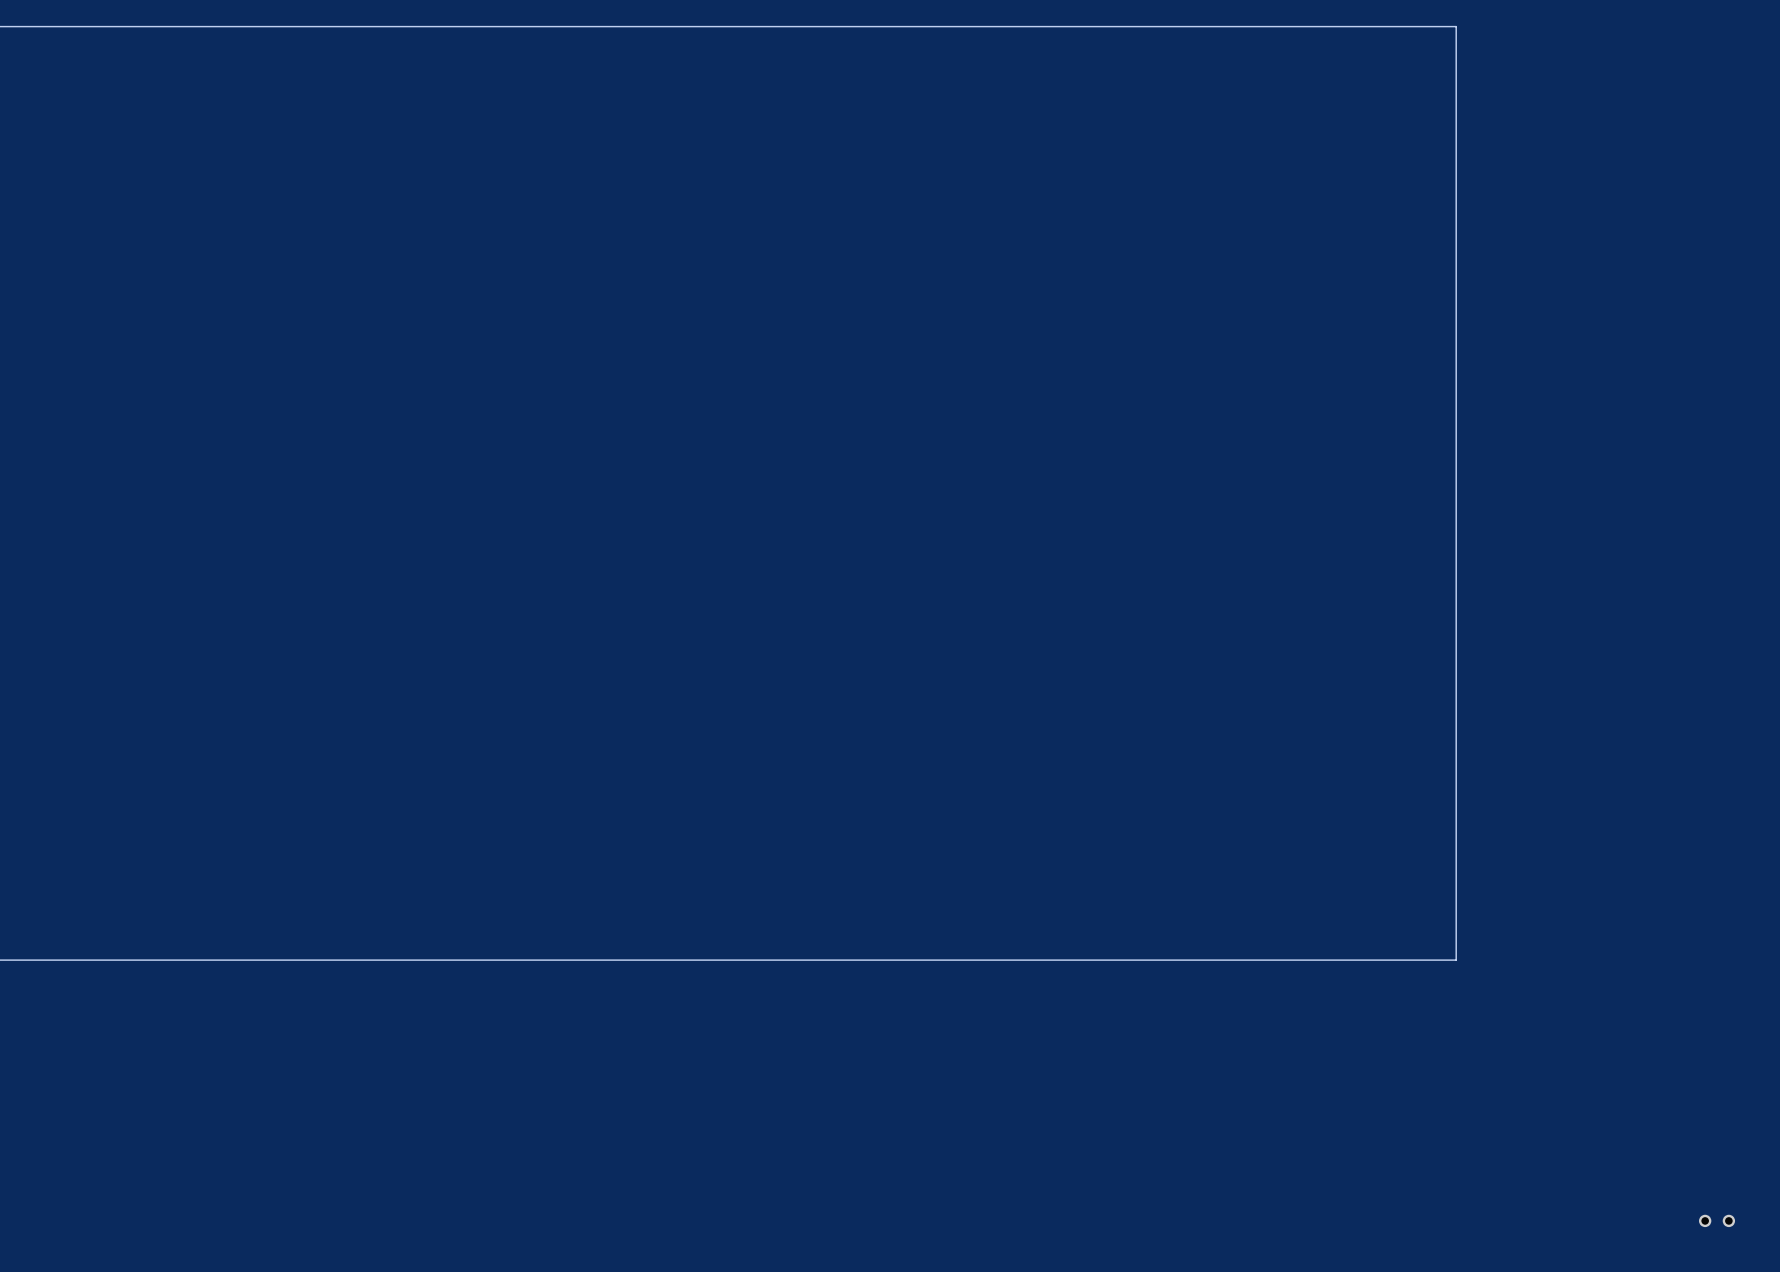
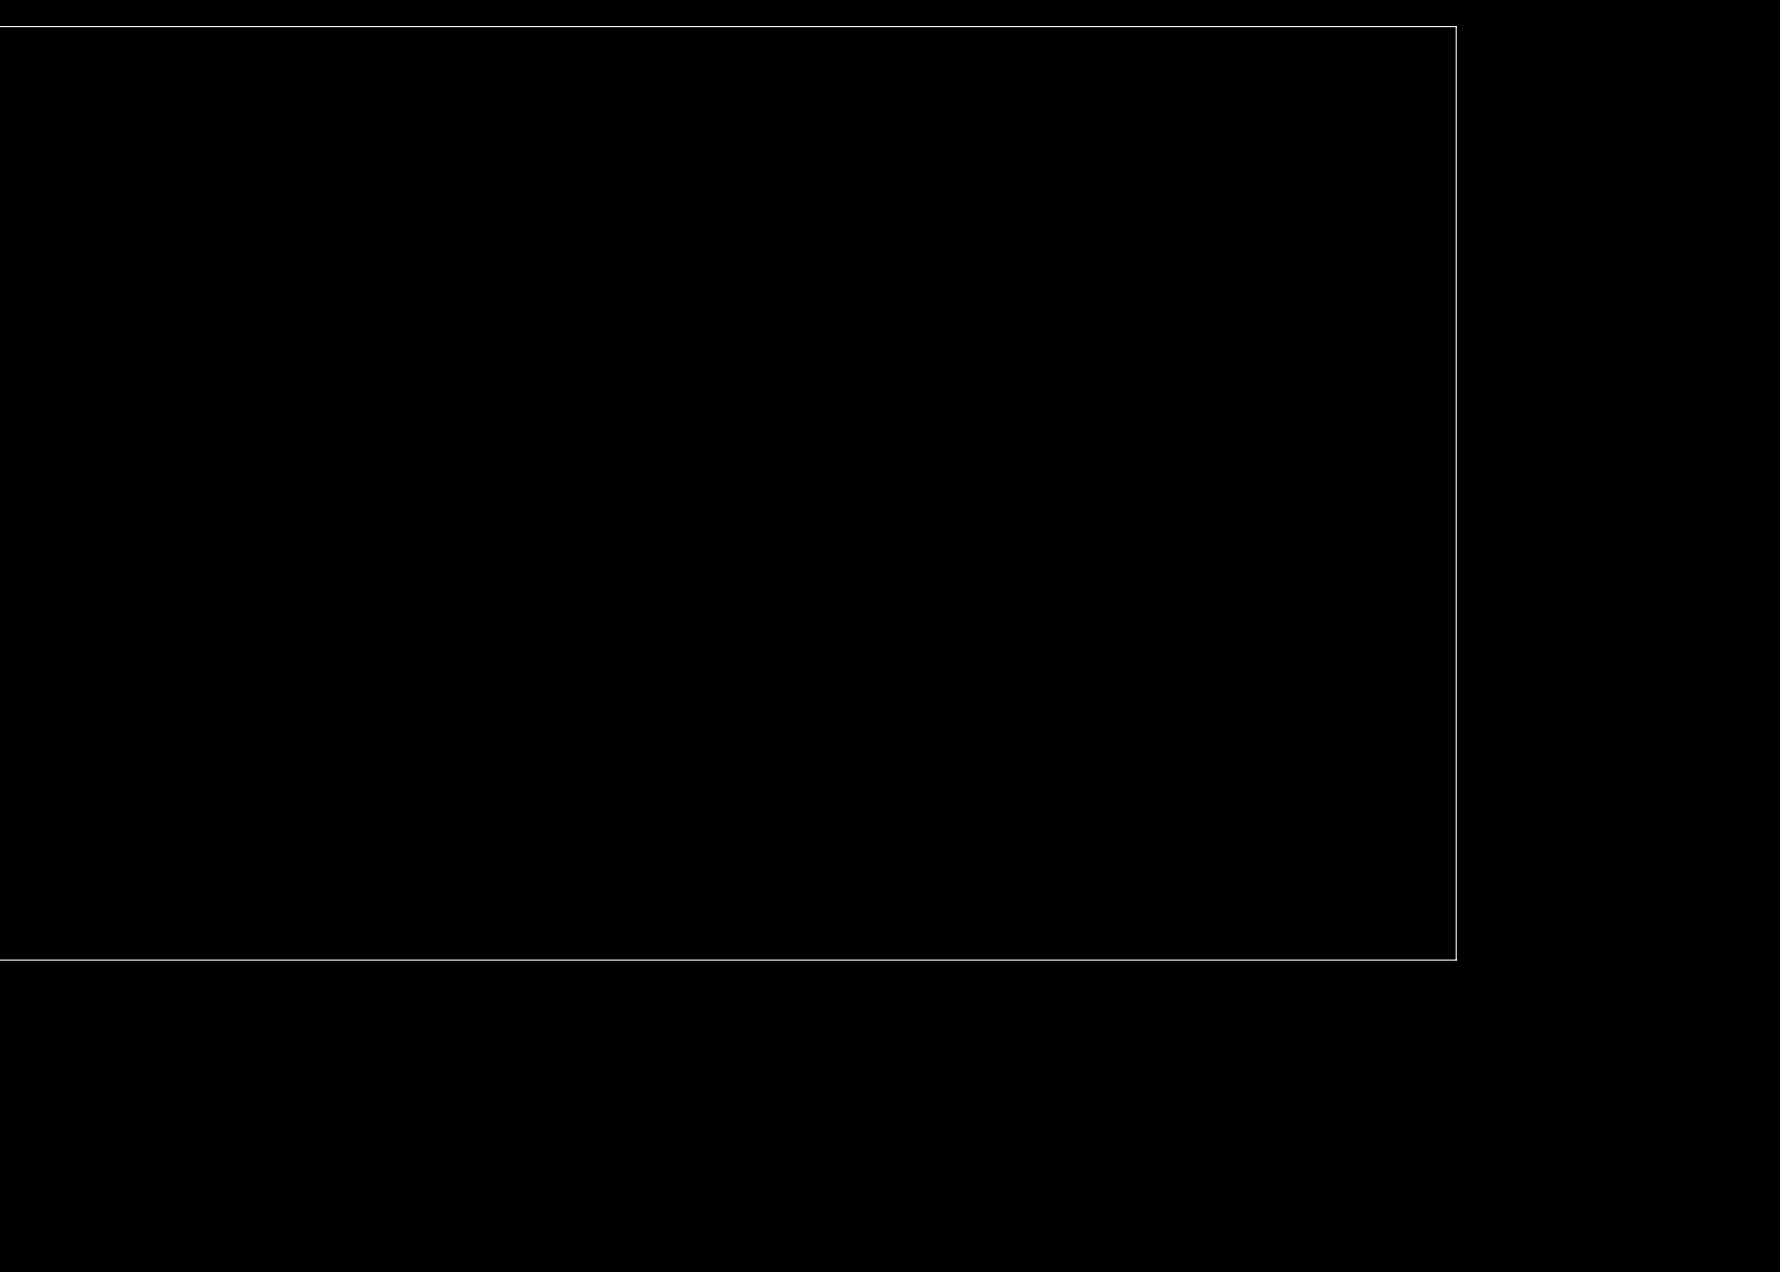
part: (1717, 1220) -> none

